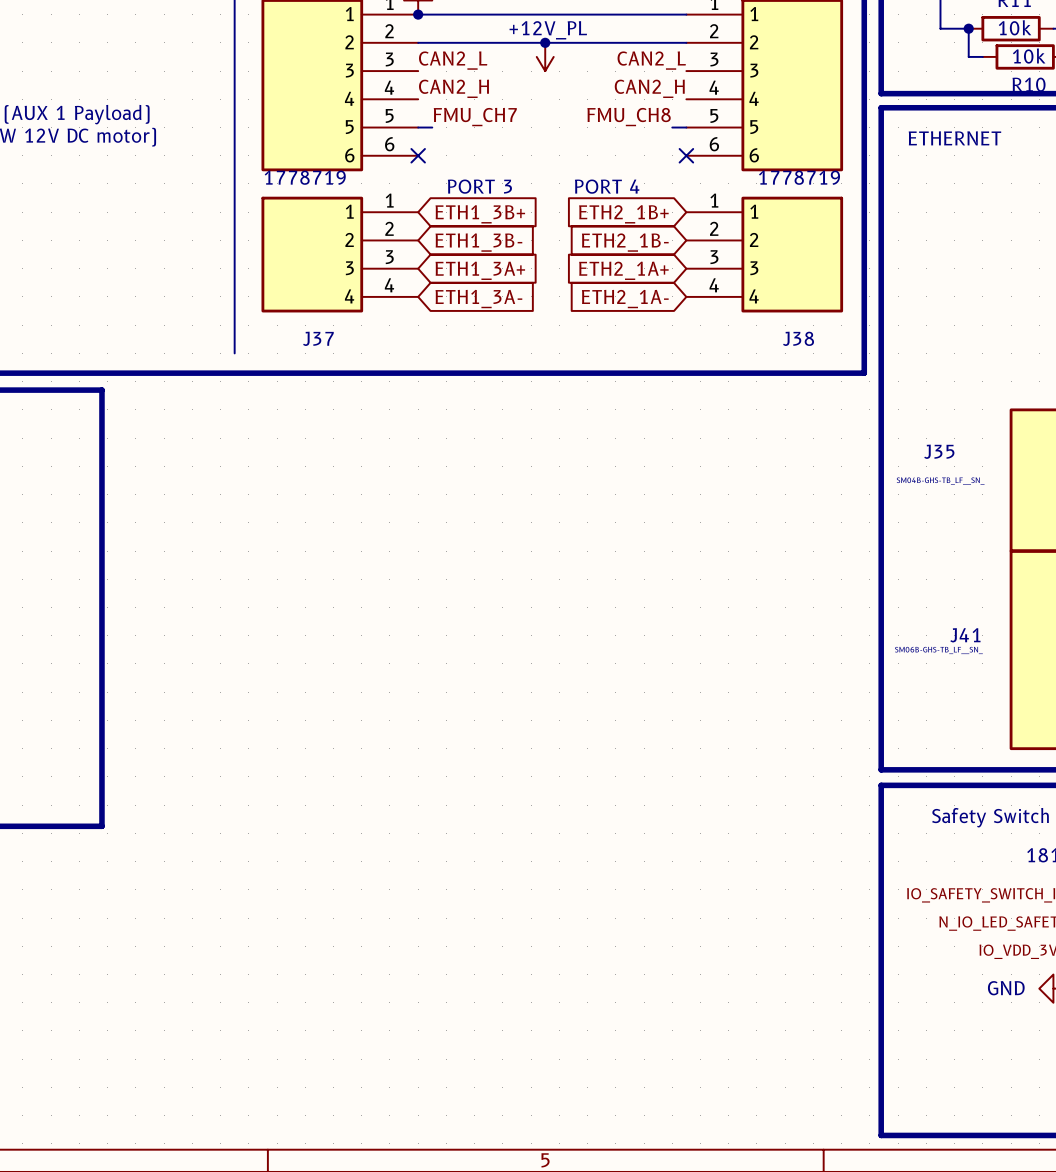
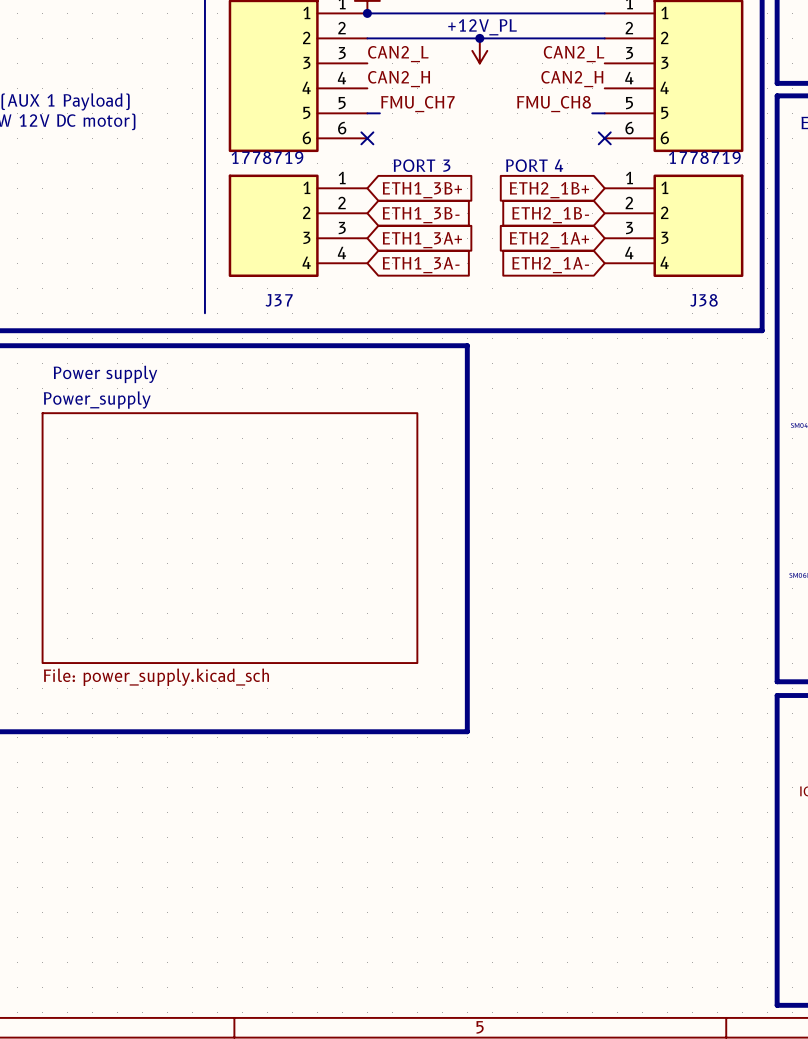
line: (101, 390) (101, 826) -> (87, 345) (467, 345) (467, 731) (87, 731)
text: none -> Power supply (105, 374)
sheet Power_supply: none -> File: power_supply.kicad_sch (229, 538)

